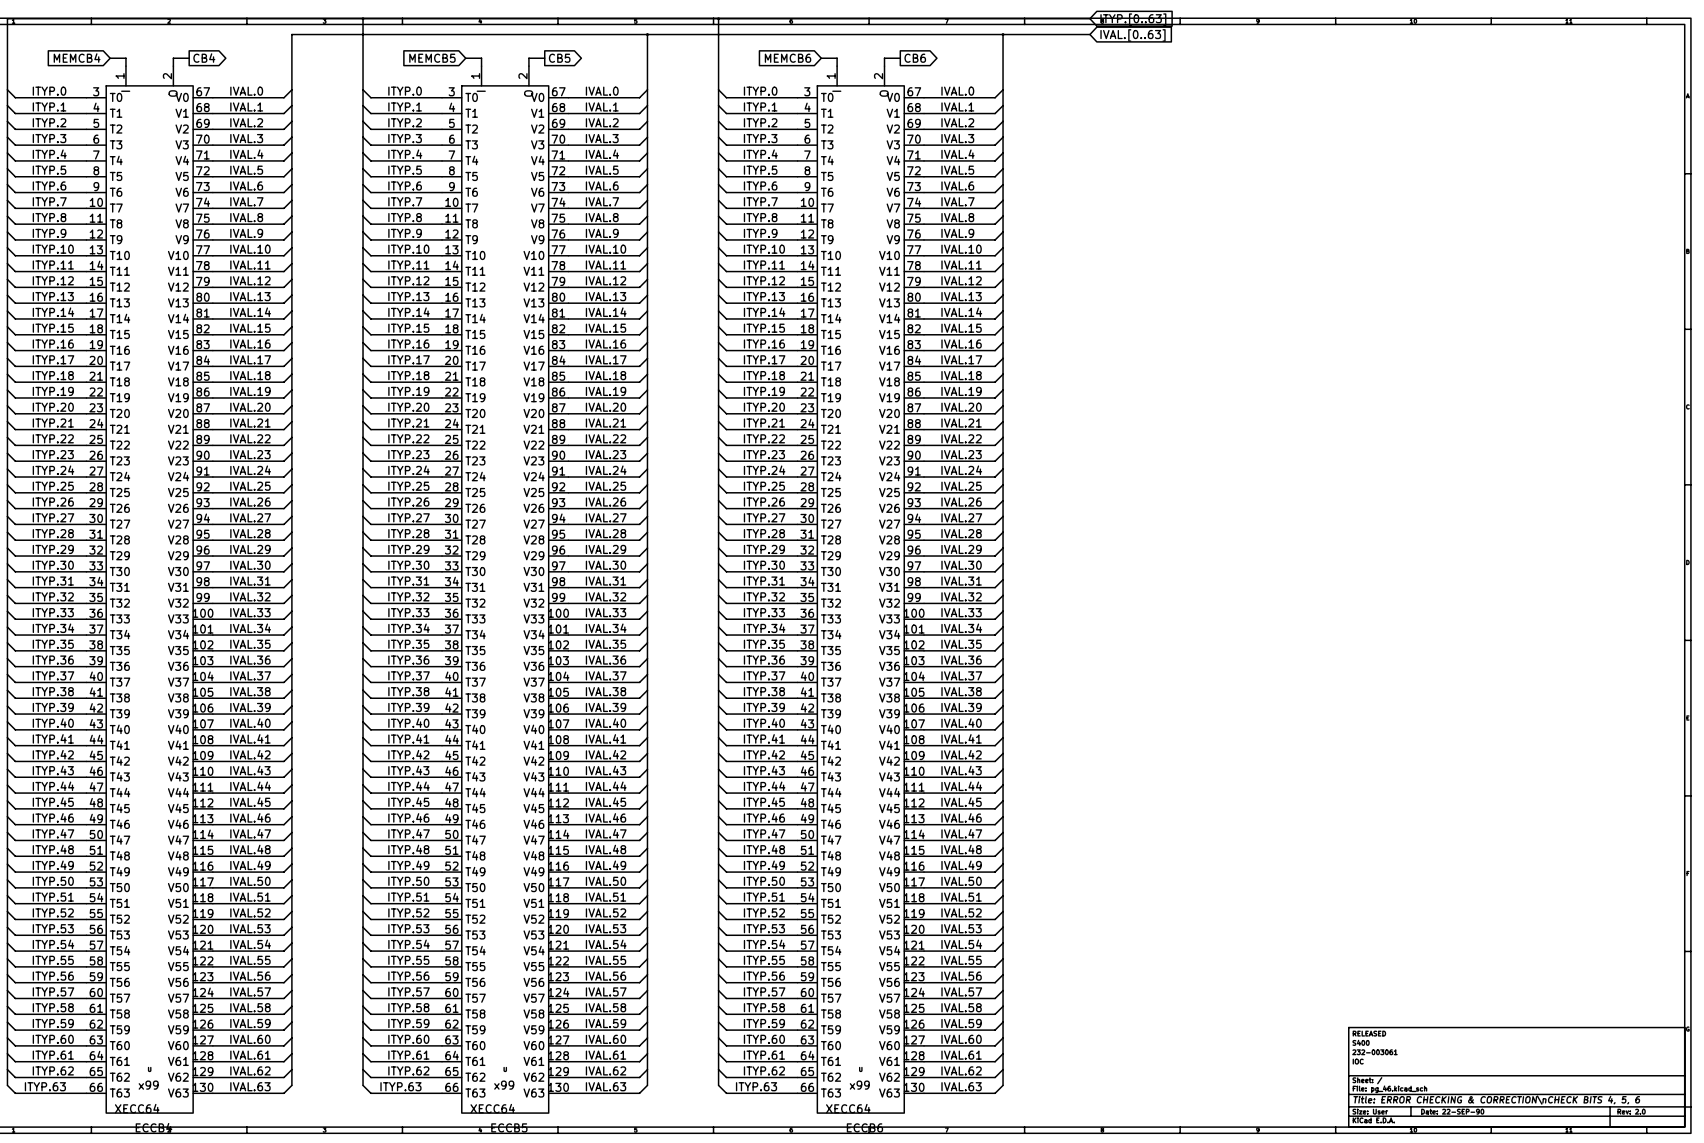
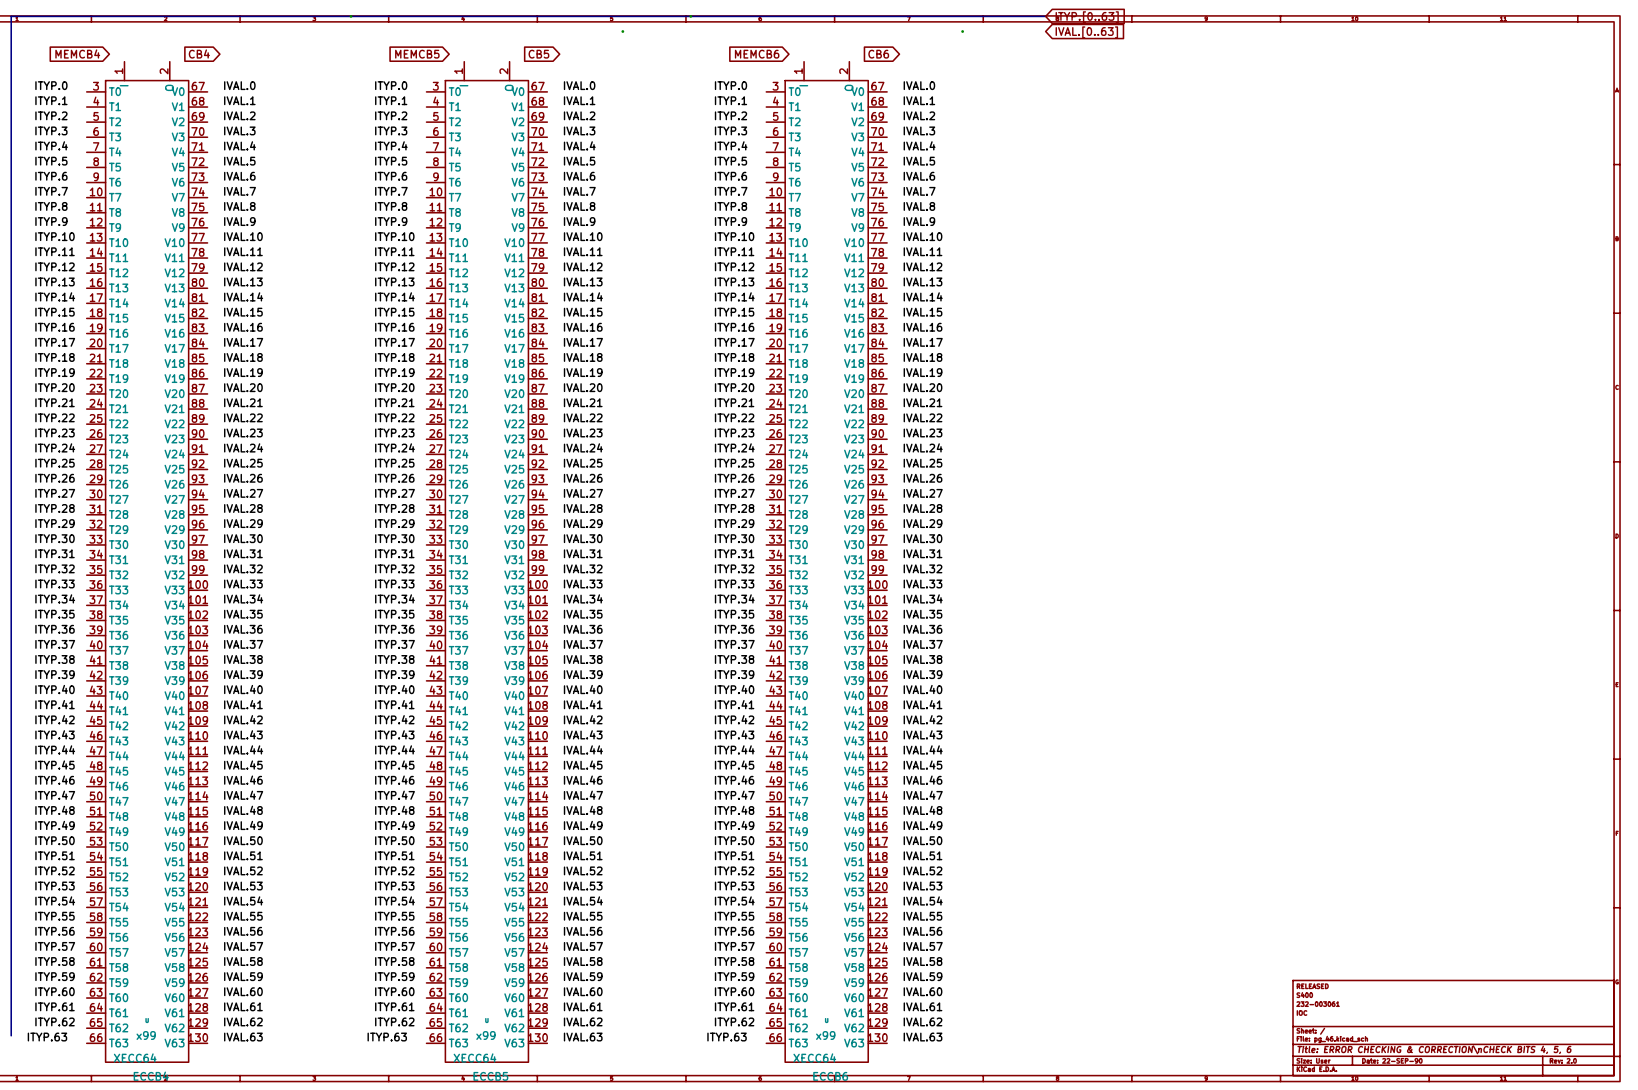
bus: (363, 18) (363, 1085) -> none
bus: (718, 18) (718, 1085) -> none
bus: (647, 34) (647, 1085) -> none
bus: (1003, 34) (1003, 1085) -> none
bus: (1089, 34) (291, 34) (291, 1085) -> none
wire: (110, 58) (125, 58) (125, 66) -> none
wire: (189, 58) (173, 58) (173, 66) -> none
wire: (465, 58) (481, 58) (481, 66) -> none
wire: (544, 58) (528, 58) (528, 66) -> none
wire: (821, 58) (837, 58) (837, 66) -> none
wire: (900, 58) (884, 58) (884, 66) -> none
wire: (7, 89) (15, 97) (86, 97) -> none
wire: (291, 89) (284, 97) (212, 97) -> none
wire: (363, 89) (370, 97) (442, 97) -> none
wire: (647, 89) (639, 97) (568, 97) -> none
wire: (718, 89) (726, 97) (797, 97) -> none
wire: (1003, 89) (995, 97) (924, 97) -> none
wire: (7, 105) (15, 113) (86, 113) -> none
wire: (291, 105) (284, 113) (212, 113) -> none
wire: (363, 105) (370, 113) (442, 113) -> none
wire: (647, 105) (639, 113) (568, 113) -> none
wire: (718, 105) (726, 113) (797, 113) -> none
wire: (1003, 105) (995, 113) (924, 113) -> none
wire: (7, 121) (15, 129) (86, 129) -> none
wire: (291, 121) (284, 129) (212, 129) -> none
wire: (363, 121) (370, 129) (442, 129) -> none
wire: (647, 121) (639, 129) (568, 129) -> none
wire: (718, 121) (726, 129) (797, 129) -> none
wire: (1003, 121) (995, 129) (924, 129) -> none
wire: (7, 137) (15, 145) (86, 145) -> none
wire: (291, 137) (284, 145) (212, 145) -> none
wire: (363, 137) (370, 145) (442, 145) -> none
wire: (647, 137) (639, 145) (568, 145) -> none
wire: (718, 137) (726, 145) (797, 145) -> none
wire: (1003, 137) (995, 145) (924, 145) -> none
wire: (7, 153) (15, 160) (86, 160) -> none
wire: (291, 153) (284, 160) (212, 160) -> none
wire: (363, 153) (370, 160) (442, 160) -> none
wire: (647, 153) (639, 160) (568, 160) -> none
wire: (718, 153) (726, 160) (797, 160) -> none
wire: (1003, 153) (995, 160) (924, 160) -> none
wire: (7, 168) (15, 176) (86, 176) -> none
wire: (291, 168) (284, 176) (212, 176) -> none
wire: (363, 168) (370, 176) (442, 176) -> none
wire: (647, 168) (639, 176) (568, 176) -> none
wire: (718, 168) (726, 176) (797, 176) -> none
wire: (1003, 168) (995, 176) (924, 176) -> none
wire: (7, 184) (15, 192) (86, 192) -> none
wire: (291, 184) (284, 192) (212, 192) -> none
wire: (363, 184) (370, 192) (442, 192) -> none
wire: (647, 184) (639, 192) (568, 192) -> none
wire: (718, 184) (726, 192) (797, 192) -> none
wire: (1003, 184) (995, 192) (924, 192) -> none
wire: (7, 200) (15, 208) (86, 208) -> none
wire: (291, 200) (284, 208) (212, 208) -> none
wire: (363, 200) (370, 208) (442, 208) -> none
wire: (647, 200) (639, 208) (568, 208) -> none
wire: (718, 200) (726, 208) (797, 208) -> none
wire: (1003, 200) (995, 208) (924, 208) -> none
wire: (7, 216) (15, 224) (86, 224) -> none
wire: (291, 216) (284, 224) (212, 224) -> none
wire: (363, 216) (370, 224) (442, 224) -> none
wire: (647, 216) (639, 224) (568, 224) -> none
wire: (718, 216) (726, 224) (797, 224) -> none
wire: (1003, 216) (995, 224) (924, 224) -> none
wire: (7, 232) (15, 239) (86, 239) -> none
wire: (291, 232) (284, 239) (212, 239) -> none
wire: (363, 232) (370, 239) (442, 239) -> none
wire: (647, 232) (639, 239) (568, 239) -> none
wire: (718, 232) (726, 239) (797, 239) -> none
wire: (1003, 232) (995, 239) (924, 239) -> none
wire: (7, 247) (15, 255) (86, 255) -> none
wire: (291, 247) (284, 255) (212, 255) -> none
wire: (363, 247) (370, 255) (442, 255) -> none
wire: (647, 247) (639, 255) (568, 255) -> none
wire: (718, 247) (726, 255) (797, 255) -> none
wire: (1003, 247) (995, 255) (924, 255) -> none
wire: (7, 263) (15, 271) (86, 271) -> none
wire: (291, 263) (284, 271) (212, 271) -> none
wire: (363, 263) (370, 271) (442, 271) -> none
wire: (647, 263) (639, 271) (568, 271) -> none
wire: (718, 263) (726, 271) (797, 271) -> none
wire: (1003, 263) (995, 271) (924, 271) -> none
wire: (7, 279) (15, 287) (86, 287) -> none
wire: (291, 279) (284, 287) (212, 287) -> none
wire: (363, 279) (370, 287) (442, 287) -> none
wire: (647, 279) (639, 287) (568, 287) -> none
wire: (718, 279) (726, 287) (797, 287) -> none
wire: (1003, 279) (995, 287) (924, 287) -> none
wire: (7, 295) (15, 303) (86, 303) -> none
wire: (291, 295) (284, 303) (212, 303) -> none
wire: (363, 295) (370, 303) (442, 303) -> none
wire: (647, 295) (639, 303) (568, 303) -> none
wire: (718, 295) (726, 303) (797, 303) -> none
wire: (1003, 295) (995, 303) (924, 303) -> none
wire: (7, 311) (15, 318) (86, 318) -> none
wire: (291, 311) (284, 318) (212, 318) -> none
wire: (363, 311) (370, 318) (442, 318) -> none
wire: (647, 311) (639, 318) (568, 318) -> none
wire: (718, 311) (726, 318) (797, 318) -> none
wire: (1003, 311) (995, 318) (924, 318) -> none
wire: (7, 326) (15, 334) (86, 334) -> none
wire: (291, 326) (284, 334) (212, 334) -> none
wire: (363, 326) (370, 334) (442, 334) -> none
wire: (647, 326) (639, 334) (568, 334) -> none
wire: (718, 326) (726, 334) (797, 334) -> none
wire: (1003, 326) (995, 334) (924, 334) -> none
wire: (7, 342) (15, 350) (86, 350) -> none
wire: (291, 342) (284, 350) (212, 350) -> none
wire: (363, 342) (370, 350) (442, 350) -> none
wire: (647, 342) (639, 350) (568, 350) -> none
wire: (718, 342) (726, 350) (797, 350) -> none
wire: (1003, 342) (995, 350) (924, 350) -> none
wire: (7, 358) (15, 366) (86, 366) -> none
wire: (291, 358) (284, 366) (212, 366) -> none
wire: (363, 358) (370, 366) (442, 366) -> none
wire: (647, 358) (639, 366) (568, 366) -> none
wire: (718, 358) (726, 366) (797, 366) -> none
wire: (1003, 358) (995, 366) (924, 366) -> none
wire: (7, 374) (15, 382) (86, 382) -> none
wire: (291, 374) (284, 382) (212, 382) -> none
wire: (363, 374) (370, 382) (442, 382) -> none
wire: (647, 374) (639, 382) (568, 382) -> none
wire: (718, 374) (726, 382) (797, 382) -> none
wire: (1003, 374) (995, 382) (924, 382) -> none
wire: (7, 390) (15, 397) (86, 397) -> none
wire: (291, 390) (284, 397) (212, 397) -> none
wire: (363, 390) (370, 397) (442, 397) -> none
wire: (647, 390) (639, 397) (568, 397) -> none
wire: (718, 390) (726, 397) (797, 397) -> none
wire: (1003, 390) (995, 397) (924, 397) -> none
wire: (7, 405) (15, 413) (86, 413) -> none
wire: (291, 405) (284, 413) (212, 413) -> none
wire: (363, 405) (370, 413) (442, 413) -> none
wire: (647, 405) (639, 413) (568, 413) -> none
wire: (718, 405) (726, 413) (797, 413) -> none
wire: (1003, 405) (995, 413) (924, 413) -> none
wire: (7, 421) (15, 429) (86, 429) -> none
wire: (291, 421) (284, 429) (212, 429) -> none
wire: (363, 421) (370, 429) (442, 429) -> none
wire: (647, 421) (639, 429) (568, 429) -> none
wire: (718, 421) (726, 429) (797, 429) -> none
wire: (1003, 421) (995, 429) (924, 429) -> none
wire: (7, 437) (15, 445) (86, 445) -> none
wire: (291, 437) (284, 445) (212, 445) -> none
wire: (363, 437) (370, 445) (442, 445) -> none
wire: (647, 437) (639, 445) (568, 445) -> none
wire: (718, 437) (726, 445) (797, 445) -> none
wire: (1003, 437) (995, 445) (924, 445) -> none
wire: (7, 453) (15, 461) (86, 461) -> none
wire: (291, 453) (284, 461) (212, 461) -> none
wire: (363, 453) (370, 461) (442, 461) -> none
wire: (647, 453) (639, 461) (568, 461) -> none
wire: (718, 453) (726, 461) (797, 461) -> none
wire: (1003, 453) (995, 461) (924, 461) -> none
wire: (7, 469) (15, 477) (86, 477) -> none
wire: (291, 469) (284, 477) (212, 477) -> none
wire: (363, 469) (370, 477) (442, 477) -> none
wire: (647, 469) (639, 477) (568, 477) -> none
wire: (718, 469) (726, 477) (797, 477) -> none
wire: (1003, 469) (995, 477) (924, 477) -> none
wire: (7, 484) (15, 492) (86, 492) -> none
wire: (291, 484) (284, 492) (212, 492) -> none
wire: (363, 484) (370, 492) (442, 492) -> none
wire: (647, 484) (639, 492) (568, 492) -> none
wire: (718, 484) (726, 492) (797, 492) -> none
wire: (1003, 484) (995, 492) (924, 492) -> none
wire: (7, 500) (15, 508) (86, 508) -> none
wire: (291, 500) (284, 508) (212, 508) -> none
wire: (363, 500) (370, 508) (442, 508) -> none
wire: (647, 500) (639, 508) (568, 508) -> none
wire: (718, 500) (726, 508) (797, 508) -> none
wire: (1003, 500) (995, 508) (924, 508) -> none
wire: (7, 516) (15, 524) (86, 524) -> none
wire: (291, 516) (284, 524) (212, 524) -> none
wire: (363, 516) (370, 524) (442, 524) -> none
wire: (647, 516) (639, 524) (568, 524) -> none
wire: (718, 516) (726, 524) (797, 524) -> none
wire: (1003, 516) (995, 524) (924, 524) -> none
wire: (7, 532) (15, 540) (86, 540) -> none
wire: (291, 532) (284, 540) (212, 540) -> none
wire: (363, 532) (370, 540) (442, 540) -> none
wire: (647, 532) (639, 540) (568, 540) -> none
wire: (718, 532) (726, 540) (797, 540) -> none
wire: (1003, 532) (995, 540) (924, 540) -> none
wire: (7, 548) (15, 556) (86, 556) -> none
wire: (291, 548) (284, 556) (212, 556) -> none
wire: (363, 548) (370, 556) (442, 556) -> none
wire: (647, 548) (639, 556) (568, 556) -> none
wire: (718, 548) (726, 556) (797, 556) -> none
wire: (1003, 548) (995, 556) (924, 556) -> none
wire: (7, 563) (15, 571) (86, 571) -> none
wire: (291, 563) (284, 571) (212, 571) -> none
wire: (363, 563) (370, 571) (442, 571) -> none
wire: (647, 563) (639, 571) (568, 571) -> none
wire: (718, 563) (726, 571) (797, 571) -> none
wire: (1003, 563) (995, 571) (924, 571) -> none
wire: (7, 579) (15, 587) (86, 587) -> none
wire: (291, 579) (284, 587) (212, 587) -> none
wire: (363, 579) (370, 587) (442, 587) -> none
wire: (647, 579) (639, 587) (568, 587) -> none
wire: (718, 579) (726, 587) (797, 587) -> none
wire: (1003, 579) (995, 587) (924, 587) -> none
wire: (7, 595) (15, 603) (86, 603) -> none
wire: (291, 595) (284, 603) (212, 603) -> none
wire: (363, 595) (370, 603) (442, 603) -> none
wire: (647, 595) (639, 603) (568, 603) -> none
wire: (718, 595) (726, 603) (797, 603) -> none
wire: (1003, 595) (995, 603) (924, 603) -> none
wire: (7, 611) (15, 619) (86, 619) -> none
wire: (291, 611) (284, 619) (212, 619) -> none
wire: (363, 611) (370, 619) (442, 619) -> none
wire: (647, 611) (639, 619) (568, 619) -> none
wire: (718, 611) (726, 619) (797, 619) -> none
wire: (1003, 611) (995, 619) (924, 619) -> none
wire: (7, 627) (15, 635) (86, 635) -> none
wire: (291, 627) (284, 635) (212, 635) -> none
wire: (363, 627) (370, 635) (442, 635) -> none
wire: (647, 627) (639, 635) (568, 635) -> none
wire: (718, 627) (726, 635) (797, 635) -> none
wire: (1003, 627) (995, 635) (924, 635) -> none
wire: (7, 642) (15, 650) (86, 650) -> none
wire: (291, 642) (284, 650) (212, 650) -> none
wire: (363, 642) (370, 650) (442, 650) -> none
wire: (647, 642) (639, 650) (568, 650) -> none
wire: (718, 642) (726, 650) (797, 650) -> none
wire: (1003, 642) (995, 650) (924, 650) -> none
wire: (7, 658) (15, 666) (86, 666) -> none
wire: (291, 658) (284, 666) (212, 666) -> none
wire: (363, 658) (370, 666) (442, 666) -> none
wire: (647, 658) (639, 666) (568, 666) -> none
wire: (718, 658) (726, 666) (797, 666) -> none
wire: (1003, 658) (995, 666) (924, 666) -> none
wire: (7, 674) (15, 682) (86, 682) -> none
wire: (291, 674) (284, 682) (212, 682) -> none
wire: (363, 674) (370, 682) (442, 682) -> none
wire: (647, 674) (639, 682) (568, 682) -> none
wire: (718, 674) (726, 682) (797, 682) -> none
wire: (1003, 674) (995, 682) (924, 682) -> none
wire: (7, 690) (15, 698) (86, 698) -> none
wire: (291, 690) (284, 698) (212, 698) -> none
wire: (363, 690) (370, 698) (442, 698) -> none
wire: (647, 690) (639, 698) (568, 698) -> none
wire: (718, 690) (726, 698) (797, 698) -> none
wire: (1003, 690) (995, 698) (924, 698) -> none
wire: (7, 706) (15, 714) (86, 714) -> none
wire: (291, 706) (284, 714) (212, 714) -> none
wire: (363, 706) (370, 714) (442, 714) -> none
wire: (647, 706) (639, 714) (568, 714) -> none
wire: (718, 706) (726, 714) (797, 714) -> none
wire: (1003, 706) (995, 714) (924, 714) -> none
wire: (7, 721) (15, 729) (86, 729) -> none
wire: (291, 721) (284, 729) (212, 729) -> none
wire: (363, 721) (370, 729) (442, 729) -> none
wire: (647, 721) (639, 729) (568, 729) -> none
wire: (718, 721) (726, 729) (797, 729) -> none
wire: (1003, 721) (995, 729) (924, 729) -> none
wire: (7, 737) (15, 745) (86, 745) -> none
wire: (291, 737) (284, 745) (212, 745) -> none
wire: (363, 737) (370, 745) (442, 745) -> none
wire: (647, 737) (639, 745) (568, 745) -> none
wire: (718, 737) (726, 745) (797, 745) -> none
wire: (1003, 737) (995, 745) (924, 745) -> none
wire: (7, 753) (15, 761) (86, 761) -> none
wire: (291, 753) (284, 761) (212, 761) -> none
wire: (363, 753) (370, 761) (442, 761) -> none
wire: (647, 753) (639, 761) (568, 761) -> none
wire: (718, 753) (726, 761) (797, 761) -> none
wire: (1003, 753) (995, 761) (924, 761) -> none
wire: (7, 769) (15, 777) (86, 777) -> none
wire: (291, 769) (284, 777) (212, 777) -> none
wire: (363, 769) (370, 777) (442, 777) -> none
wire: (647, 769) (639, 777) (568, 777) -> none
wire: (718, 769) (726, 777) (797, 777) -> none
wire: (1003, 769) (995, 777) (924, 777) -> none
wire: (7, 785) (15, 793) (86, 793) -> none
wire: (291, 785) (284, 793) (212, 793) -> none
wire: (363, 785) (370, 793) (442, 793) -> none
wire: (647, 785) (639, 793) (568, 793) -> none
wire: (718, 785) (726, 793) (797, 793) -> none
wire: (1003, 785) (995, 793) (924, 793) -> none
wire: (7, 800) (15, 808) (86, 808) -> none
wire: (291, 800) (284, 808) (212, 808) -> none
wire: (363, 800) (370, 808) (442, 808) -> none
wire: (647, 800) (639, 808) (568, 808) -> none
wire: (718, 800) (726, 808) (797, 808) -> none
wire: (1003, 800) (995, 808) (924, 808) -> none
wire: (7, 816) (15, 824) (86, 824) -> none
wire: (291, 816) (284, 824) (212, 824) -> none
wire: (363, 816) (370, 824) (442, 824) -> none
wire: (647, 816) (639, 824) (568, 824) -> none
wire: (718, 816) (726, 824) (797, 824) -> none
wire: (1003, 816) (995, 824) (924, 824) -> none
wire: (7, 832) (15, 840) (86, 840) -> none
wire: (291, 832) (284, 840) (212, 840) -> none
wire: (363, 832) (370, 840) (442, 840) -> none
wire: (647, 832) (639, 840) (568, 840) -> none
wire: (718, 832) (726, 840) (797, 840) -> none
wire: (1003, 832) (995, 840) (924, 840) -> none
wire: (7, 848) (15, 856) (86, 856) -> none
wire: (291, 848) (284, 856) (212, 856) -> none
wire: (363, 848) (370, 856) (442, 856) -> none
wire: (647, 848) (639, 856) (568, 856) -> none
wire: (718, 848) (726, 856) (797, 856) -> none
wire: (1003, 848) (995, 856) (924, 856) -> none
wire: (7, 864) (15, 872) (86, 872) -> none
wire: (291, 864) (284, 872) (212, 872) -> none
wire: (363, 864) (370, 872) (442, 872) -> none
wire: (647, 864) (639, 872) (568, 872) -> none
wire: (718, 864) (726, 872) (797, 872) -> none
wire: (1003, 864) (995, 872) (924, 872) -> none
wire: (7, 879) (15, 887) (86, 887) -> none
wire: (291, 879) (284, 887) (212, 887) -> none
wire: (363, 879) (370, 887) (442, 887) -> none
wire: (647, 879) (639, 887) (568, 887) -> none
wire: (718, 879) (726, 887) (797, 887) -> none
wire: (1003, 879) (995, 887) (924, 887) -> none
wire: (7, 895) (15, 903) (86, 903) -> none
wire: (291, 895) (284, 903) (212, 903) -> none
wire: (363, 895) (370, 903) (442, 903) -> none
wire: (647, 895) (639, 903) (568, 903) -> none
wire: (718, 895) (726, 903) (797, 903) -> none
wire: (1003, 895) (995, 903) (924, 903) -> none
wire: (7, 911) (15, 919) (86, 919) -> none
wire: (291, 911) (284, 919) (212, 919) -> none
wire: (363, 911) (370, 919) (442, 919) -> none
wire: (647, 911) (639, 919) (568, 919) -> none
wire: (718, 911) (726, 919) (797, 919) -> none
wire: (1003, 911) (995, 919) (924, 919) -> none
wire: (7, 927) (15, 935) (86, 935) -> none
wire: (291, 927) (284, 935) (212, 935) -> none
wire: (363, 927) (370, 935) (442, 935) -> none
wire: (647, 927) (639, 935) (568, 935) -> none
wire: (718, 927) (726, 935) (797, 935) -> none
wire: (1003, 927) (995, 935) (924, 935) -> none
wire: (7, 943) (15, 951) (86, 951) -> none
wire: (291, 943) (284, 951) (212, 951) -> none
wire: (363, 943) (370, 951) (442, 951) -> none
wire: (647, 943) (639, 951) (568, 951) -> none
wire: (718, 943) (726, 951) (797, 951) -> none
wire: (1003, 943) (995, 951) (924, 951) -> none
wire: (7, 958) (15, 966) (86, 966) -> none
wire: (291, 958) (284, 966) (212, 966) -> none
wire: (363, 958) (370, 966) (442, 966) -> none
wire: (647, 958) (639, 966) (568, 966) -> none
wire: (718, 958) (726, 966) (797, 966) -> none
wire: (1003, 958) (995, 966) (924, 966) -> none
wire: (7, 974) (15, 982) (86, 982) -> none
wire: (291, 974) (284, 982) (212, 982) -> none
wire: (363, 974) (370, 982) (442, 982) -> none
wire: (647, 974) (639, 982) (568, 982) -> none
wire: (718, 974) (726, 982) (797, 982) -> none
wire: (1003, 974) (995, 982) (924, 982) -> none
wire: (7, 990) (15, 998) (86, 998) -> none
wire: (291, 990) (284, 998) (212, 998) -> none
wire: (363, 990) (370, 998) (442, 998) -> none
wire: (647, 990) (639, 998) (568, 998) -> none
wire: (718, 990) (726, 998) (797, 998) -> none
wire: (1003, 990) (995, 998) (924, 998) -> none
wire: (7, 1006) (15, 1014) (86, 1014) -> none
wire: (291, 1006) (284, 1014) (212, 1014) -> none
wire: (363, 1006) (370, 1014) (442, 1014) -> none
wire: (647, 1006) (639, 1014) (568, 1014) -> none
wire: (718, 1006) (726, 1014) (797, 1014) -> none
wire: (1003, 1006) (995, 1014) (924, 1014) -> none
wire: (7, 1022) (15, 1030) (86, 1030) -> none
wire: (291, 1022) (284, 1030) (212, 1030) -> none
wire: (363, 1022) (370, 1030) (442, 1030) -> none
wire: (647, 1022) (639, 1030) (568, 1030) -> none
wire: (718, 1022) (726, 1030) (797, 1030) -> none
wire: (1003, 1022) (995, 1030) (924, 1030) -> none
wire: (7, 1038) (15, 1045) (86, 1045) -> none
wire: (291, 1038) (284, 1045) (212, 1045) -> none
wire: (363, 1038) (370, 1045) (442, 1045) -> none
wire: (647, 1038) (639, 1045) (568, 1045) -> none
wire: (718, 1038) (726, 1045) (797, 1045) -> none
wire: (1003, 1038) (995, 1045) (924, 1045) -> none
wire: (7, 1053) (15, 1061) (86, 1061) -> none
wire: (291, 1053) (284, 1061) (212, 1061) -> none
wire: (363, 1053) (370, 1061) (442, 1061) -> none
wire: (647, 1053) (639, 1061) (568, 1061) -> none
wire: (718, 1053) (726, 1061) (797, 1061) -> none
wire: (1003, 1053) (995, 1061) (924, 1061) -> none
wire: (7, 1069) (15, 1077) (86, 1077) -> none
wire: (291, 1069) (284, 1077) (212, 1077) -> none
wire: (363, 1069) (370, 1077) (442, 1077) -> none
wire: (647, 1069) (639, 1077) (568, 1077) -> none
wire: (718, 1069) (726, 1077) (797, 1077) -> none
wire: (1003, 1069) (995, 1077) (924, 1077) -> none
wire: (7, 1085) (15, 1093) (86, 1093) -> none
wire: (291, 1085) (284, 1093) (212, 1093) -> none
wire: (363, 1085) (370, 1093) (442, 1093) -> none
wire: (647, 1085) (639, 1093) (568, 1093) -> none
wire: (718, 1085) (726, 1093) (797, 1093) -> none
wire: (1003, 1085) (995, 1093) (924, 1093) -> none

